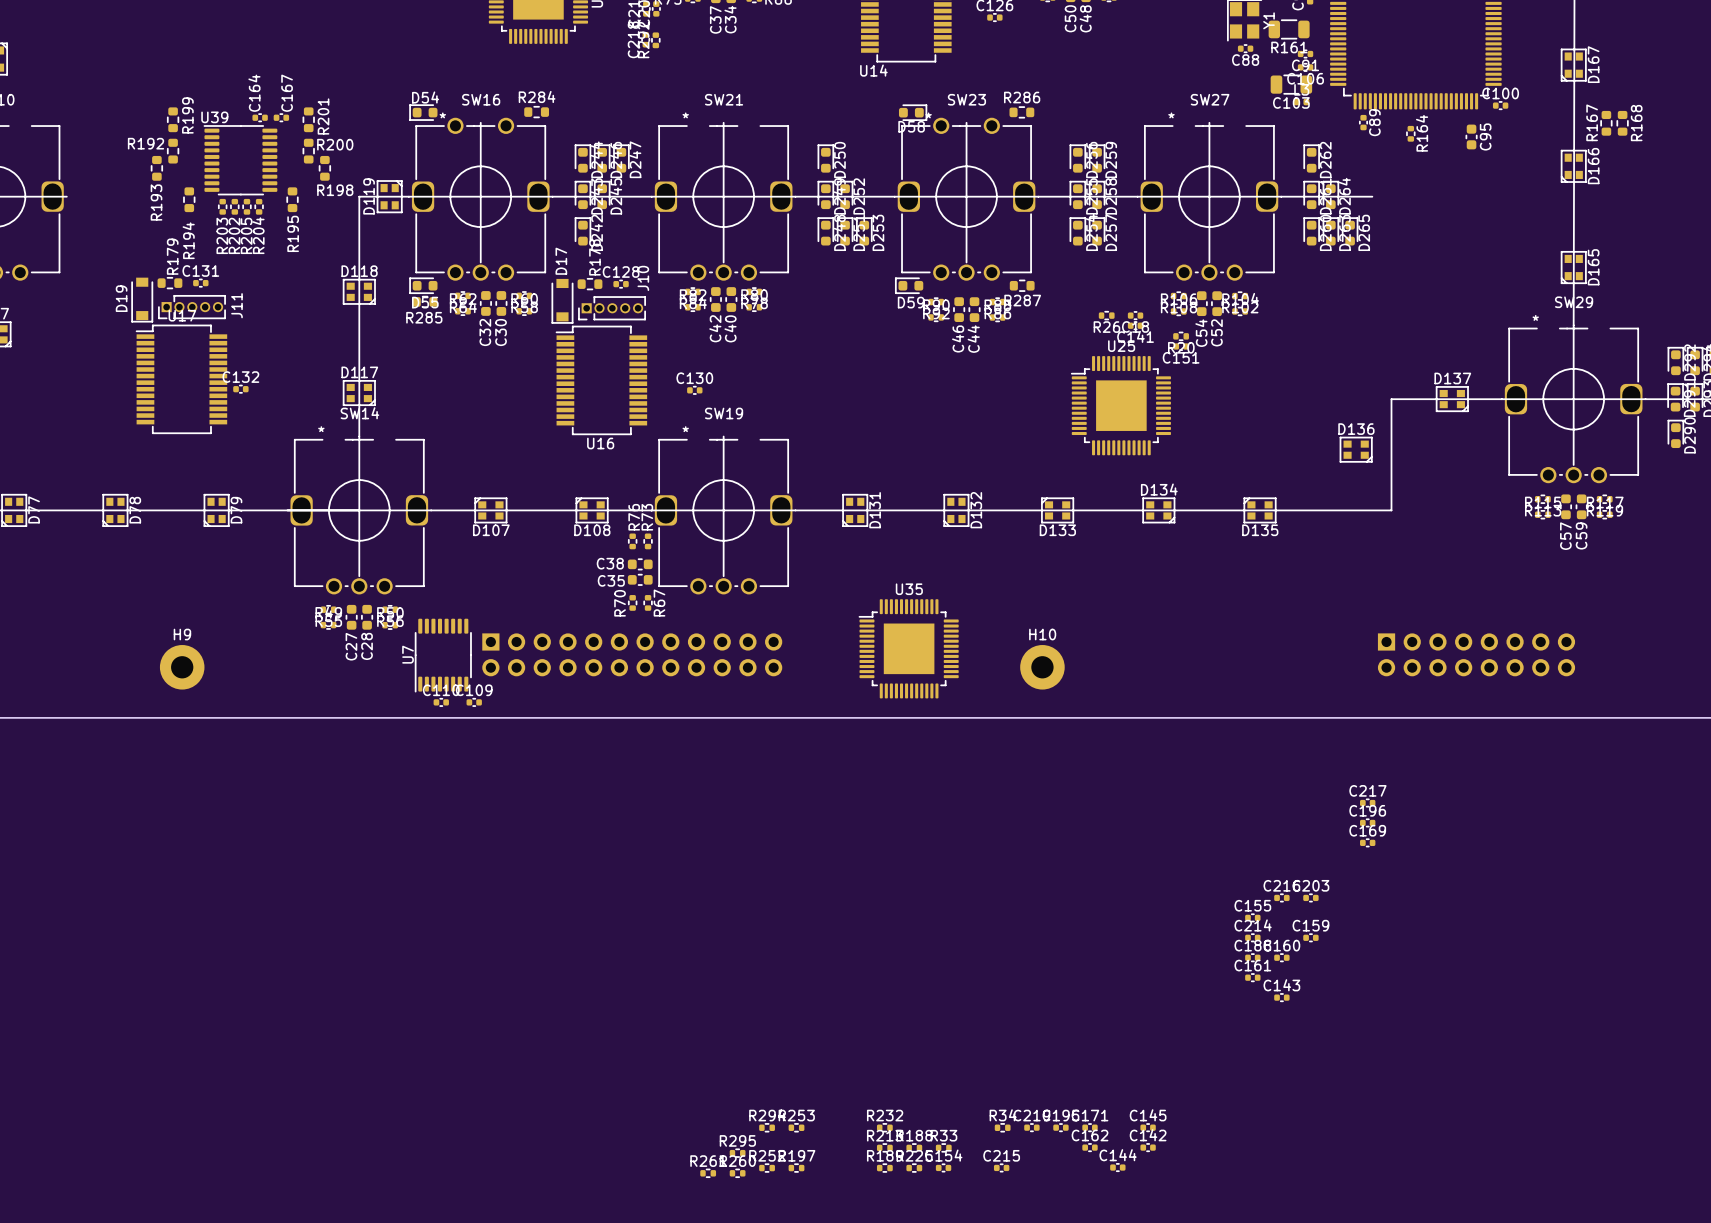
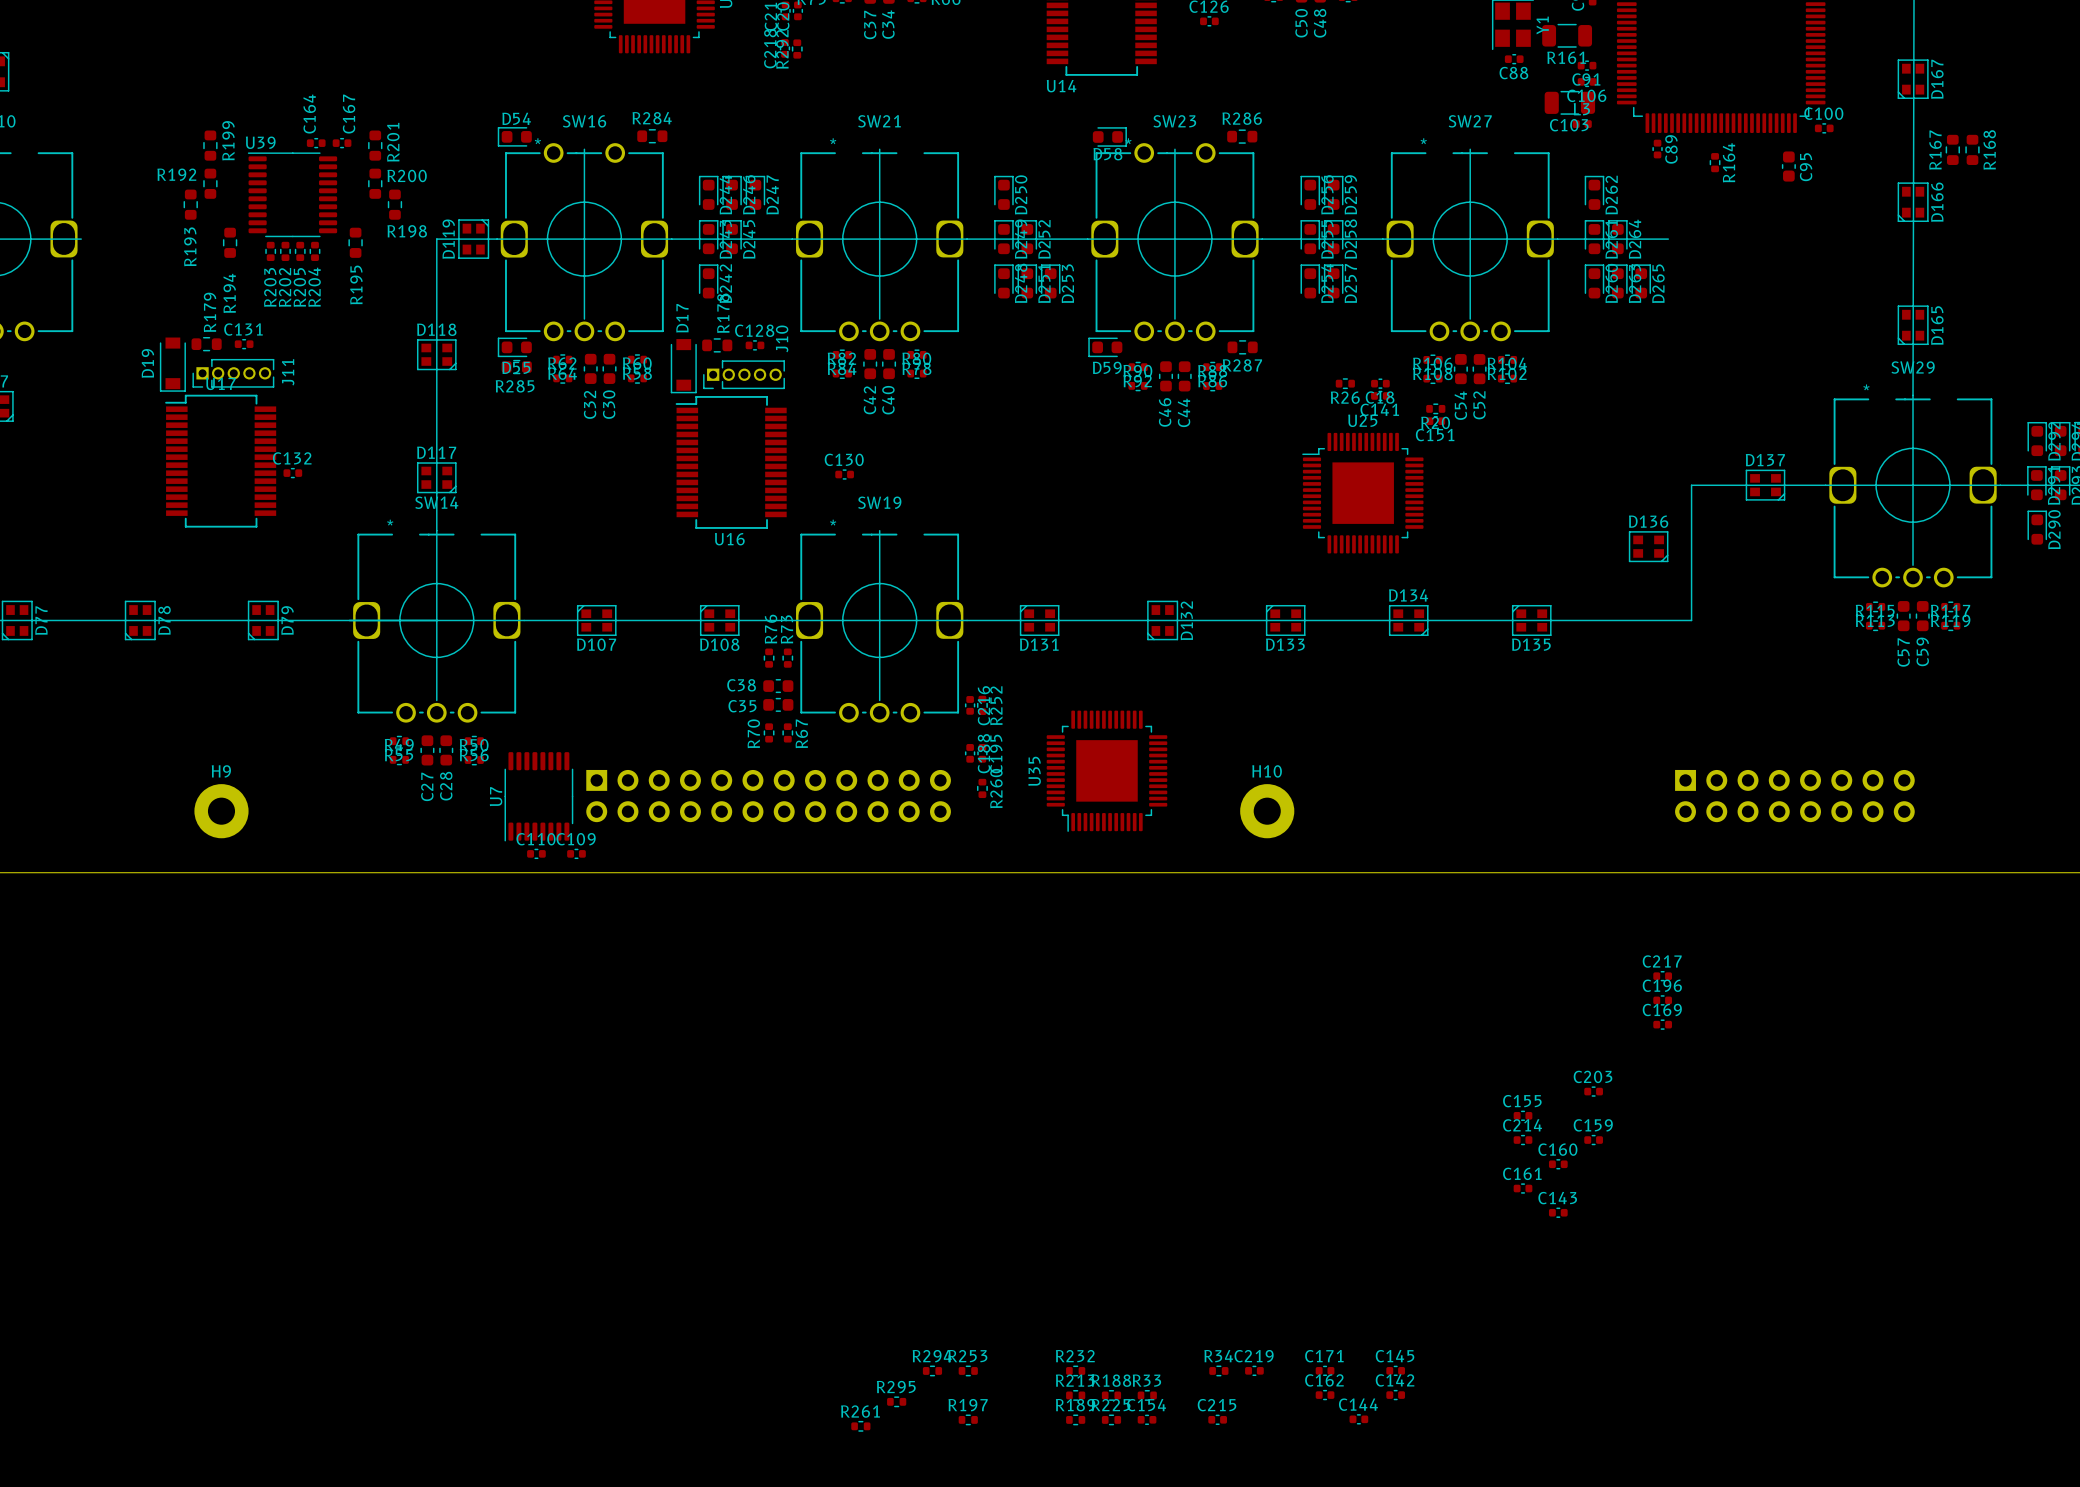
D131 rotation: 0° (855, 510) -> 90° clockwise (1039, 620)
U35 rotation: 0° (908, 648) -> 90° counterclockwise (1106, 771)
C216 rotation: 0° (1281, 897) -> 90° clockwise (970, 705)
C216 position: (1281, 897) -> (970, 705)
C188 rotation: 0° (1252, 957) -> 90° clockwise (970, 753)
C188 position: (1252, 957) -> (970, 753)
C195 rotation: 0° (1060, 1127) -> 90° clockwise (982, 753)
C195 position: (1060, 1127) -> (982, 753)
R252 rotation: 0° (767, 1168) -> 90° clockwise (982, 705)
R252 position: (767, 1168) -> (982, 705)
R260 rotation: 0° (737, 1173) -> 90° clockwise (982, 788)
R260 position: (737, 1173) -> (982, 788)

